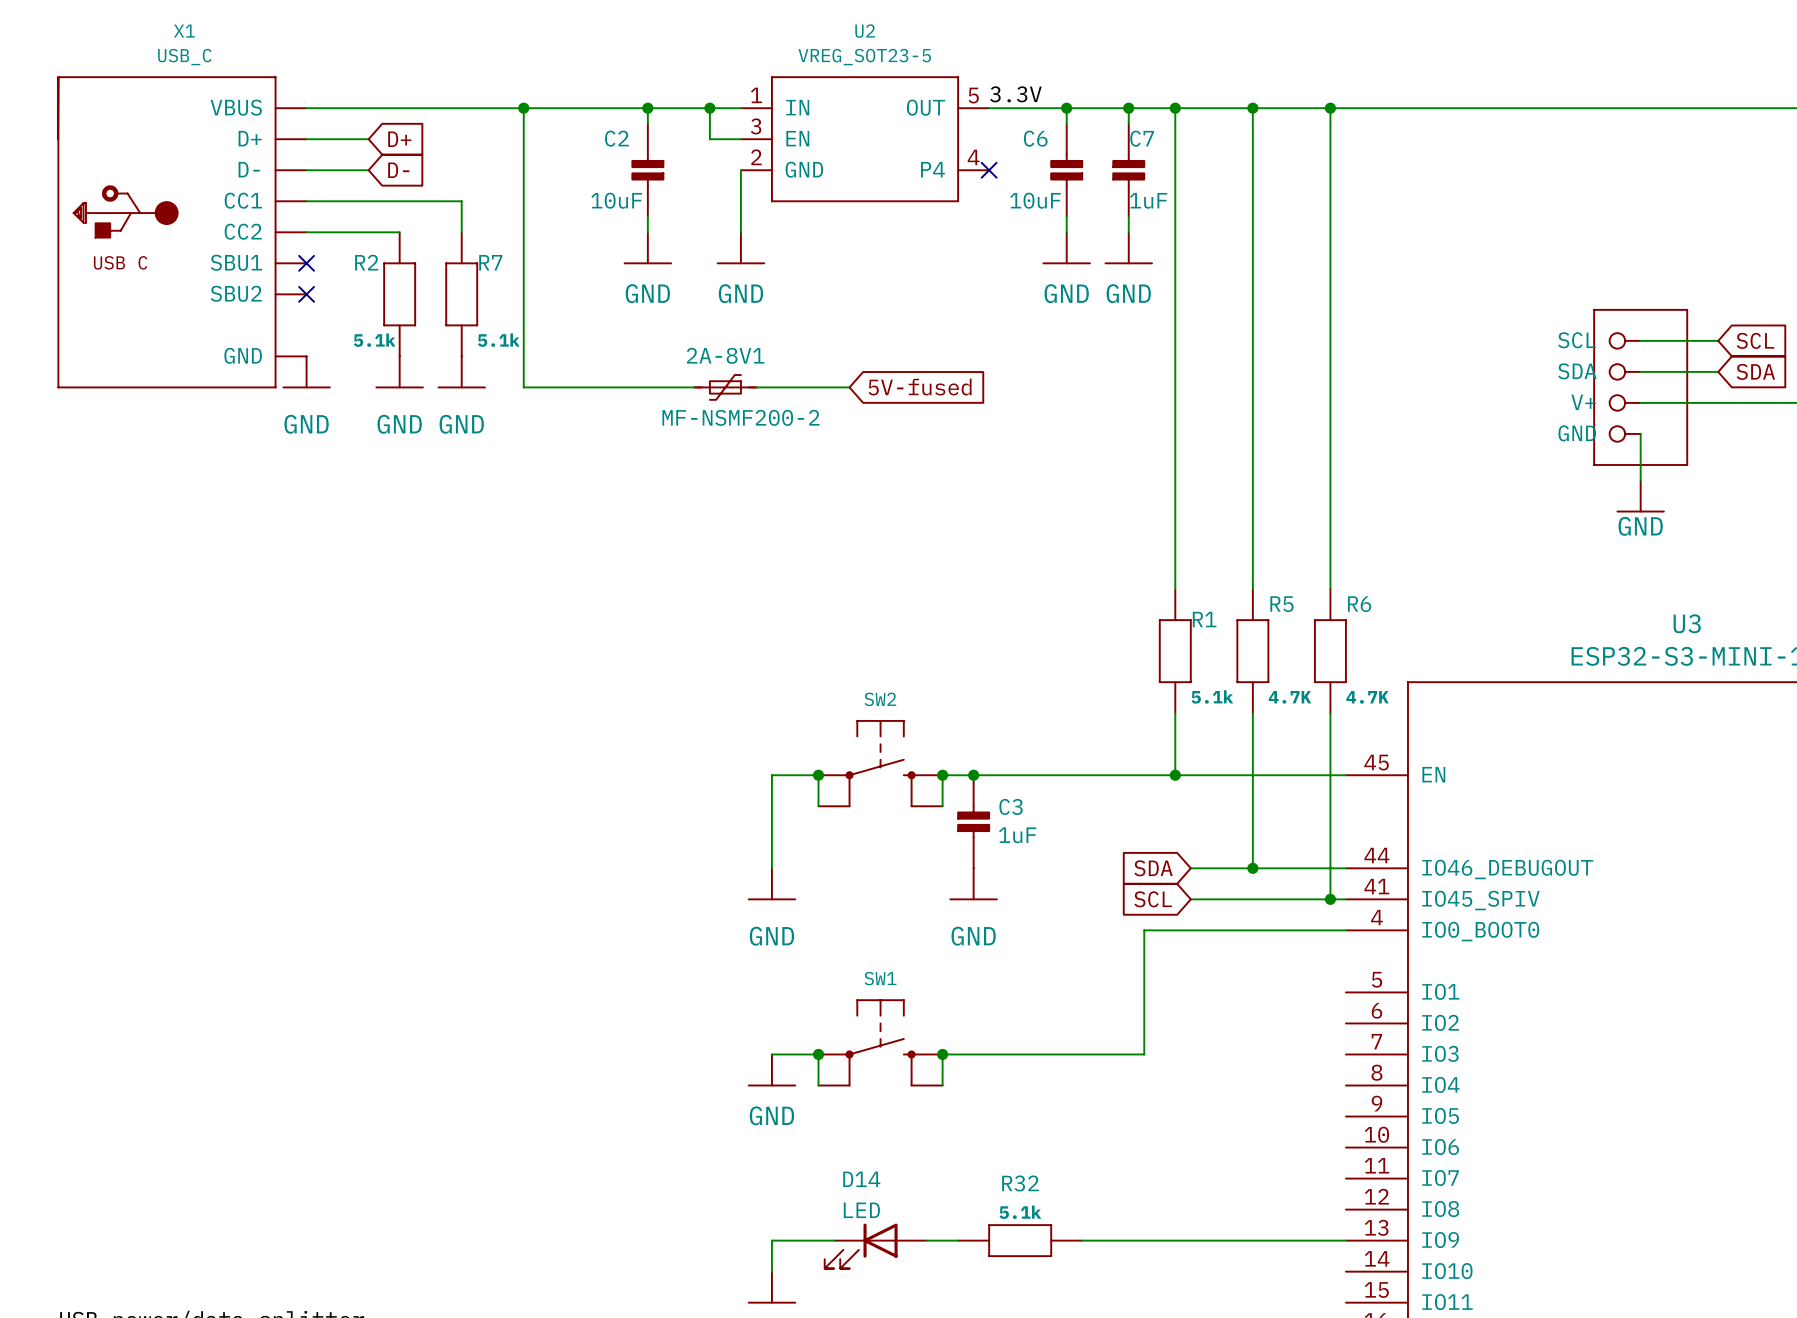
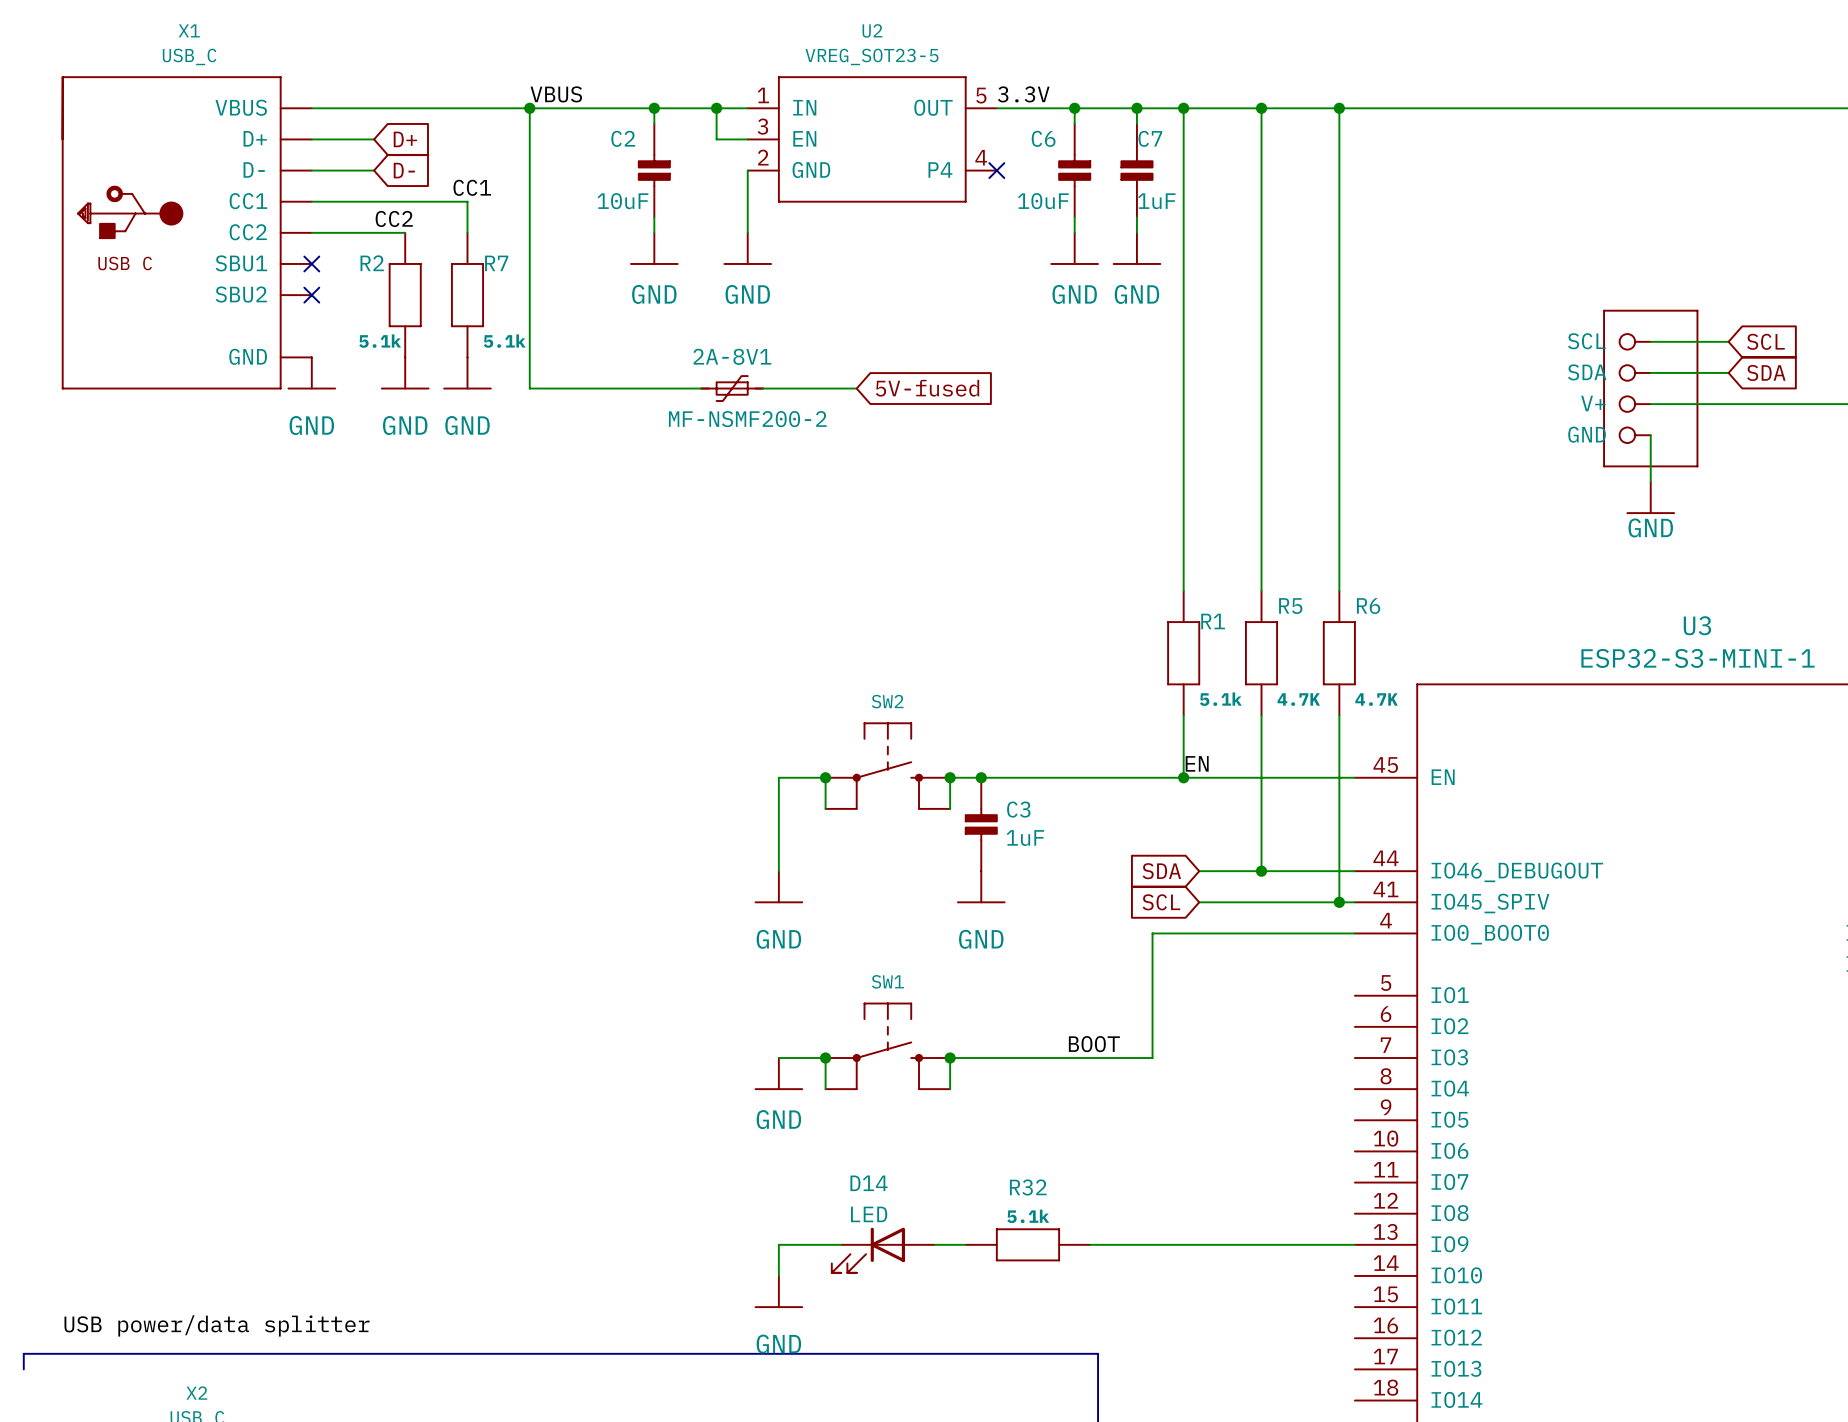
label: none -> VBUS (556, 94)
label: none -> CC1 (472, 187)
label: none -> CC2 (394, 218)
label: none -> EN (1197, 763)
label: none -> BOOT (1094, 1044)

